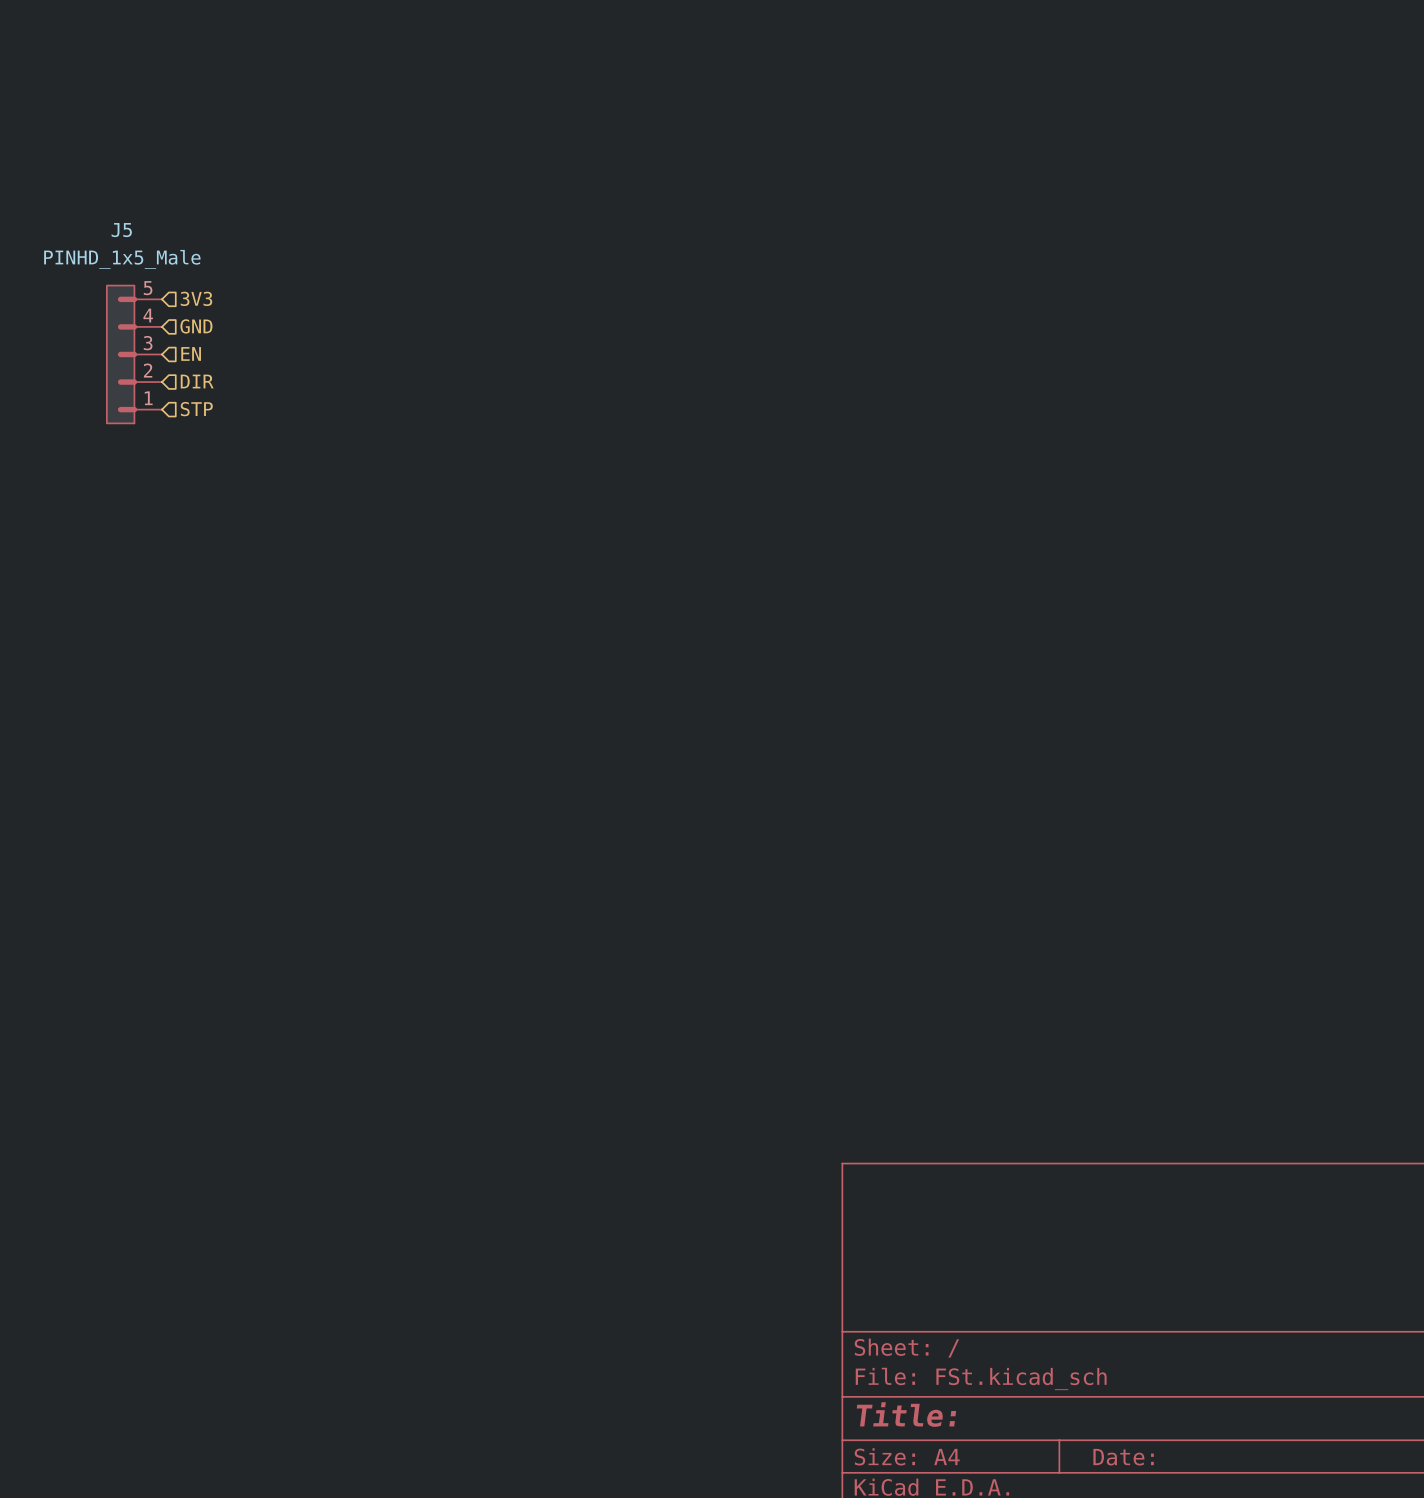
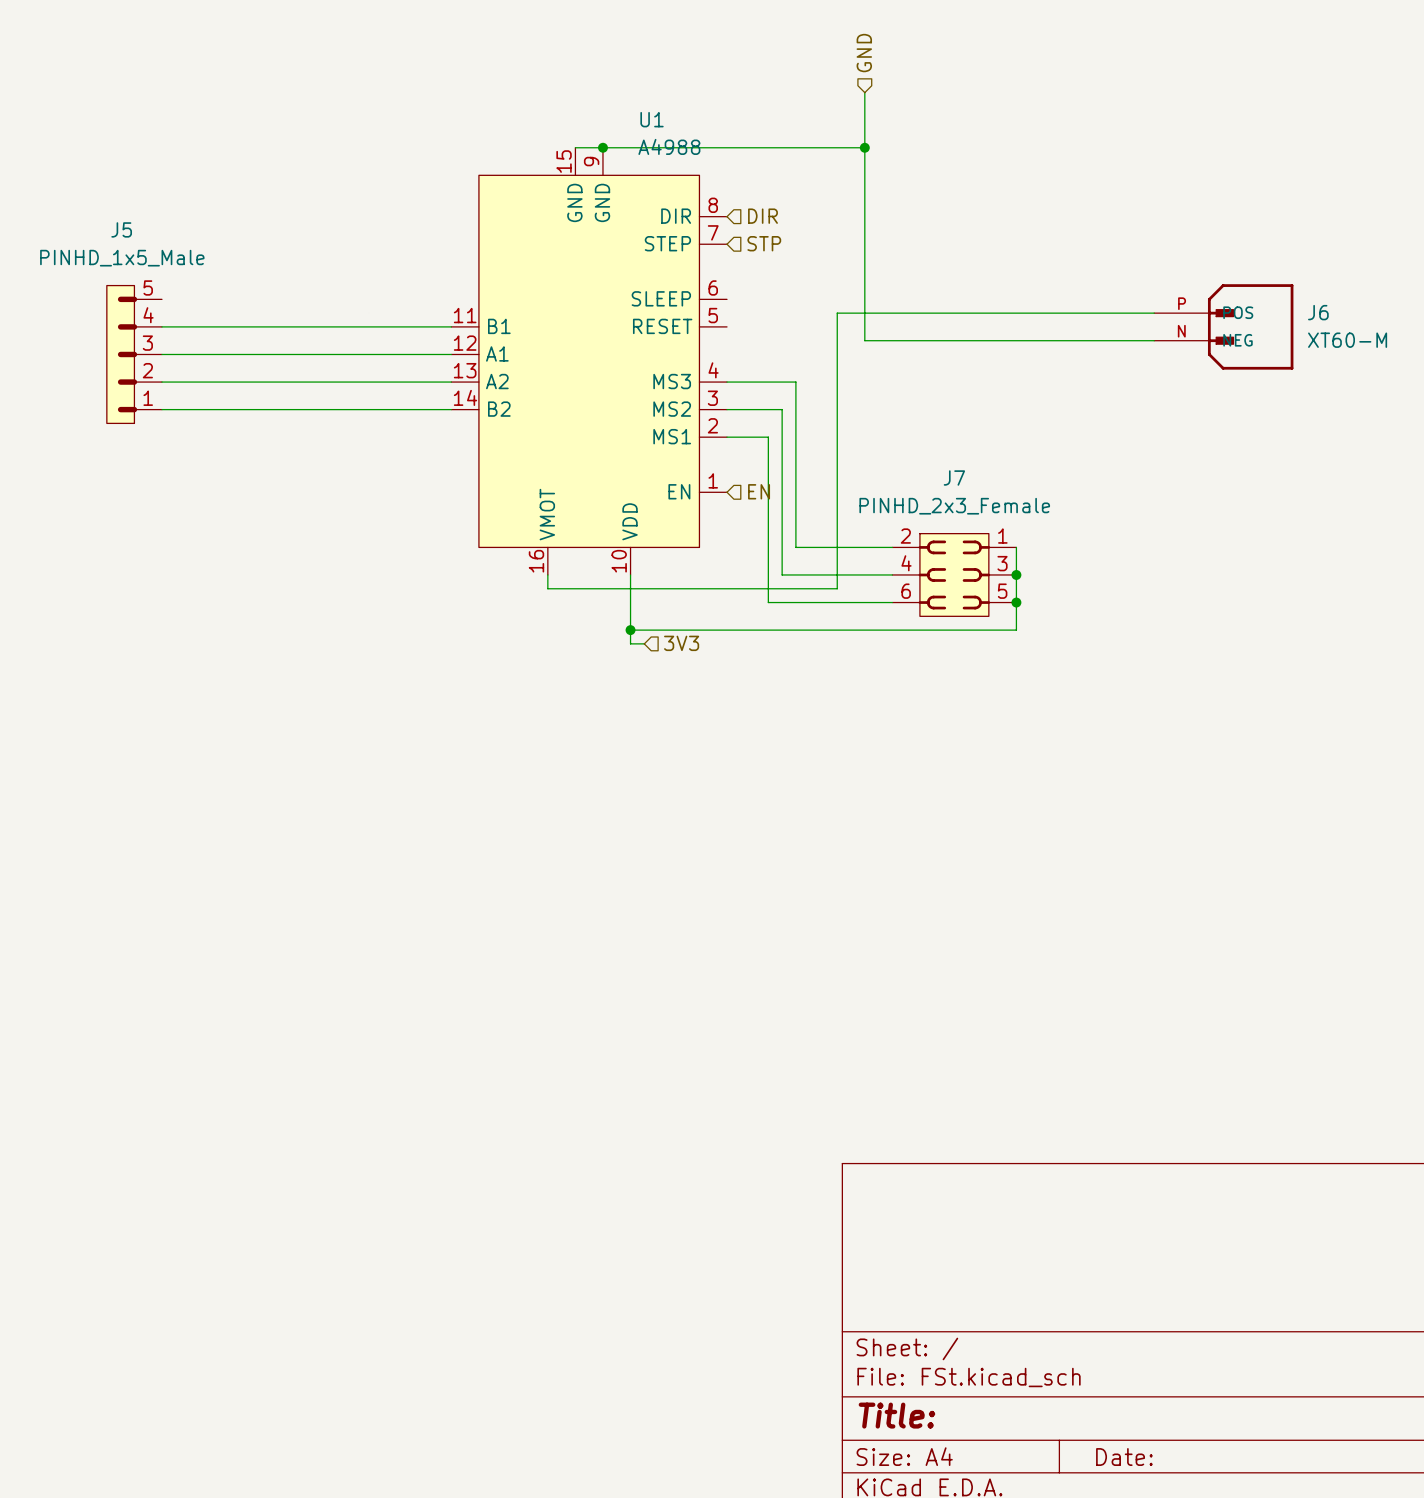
hierarchical label: none -> GND (864, 53)
wire: none -> (864, 92) (864, 340) (1154, 340)
wire: none -> (575, 147) (864, 147)
junction: none -> (602, 147)
junction: none -> (864, 147)
hierarchical label: none -> DIR (762, 216)
hierarchical label: none -> STP (764, 243)
hierarchical label: 3V3 (196, 298) -> none
wire: none -> (1154, 313) (837, 313) (837, 588) (547, 588) (547, 574)
wire: none -> (161, 326) (451, 326)
hierarchical label: GND (196, 326) -> none
J6: none -> XT60-M (1223, 326)
hierarchical label: EN (191, 353) -> none
wire: none -> (161, 354) (451, 354)
U1: none -> A4988 (547, 361)
hierarchical label: DIR (197, 381) -> none
wire: none -> (161, 382) (451, 382)
wire: none -> (727, 382) (795, 382) (795, 547) (892, 547)
wire: none -> (161, 409) (451, 409)
hierarchical label: STP (196, 409) -> none
wire: none -> (727, 409) (782, 409) (782, 574) (892, 574)
wire: none -> (727, 437) (768, 437) (768, 602) (892, 602)
hierarchical label: none -> EN (759, 491)
wire: none -> (1016, 547) (1016, 630) (630, 630)
wire: none -> (630, 574) (630, 643) (644, 643)
J7: none -> PINHD_2x3_Female (954, 574)
junction: none -> (1016, 574)
junction: none -> (1016, 602)
junction: none -> (630, 630)
hierarchical label: none -> 3V3 (681, 643)

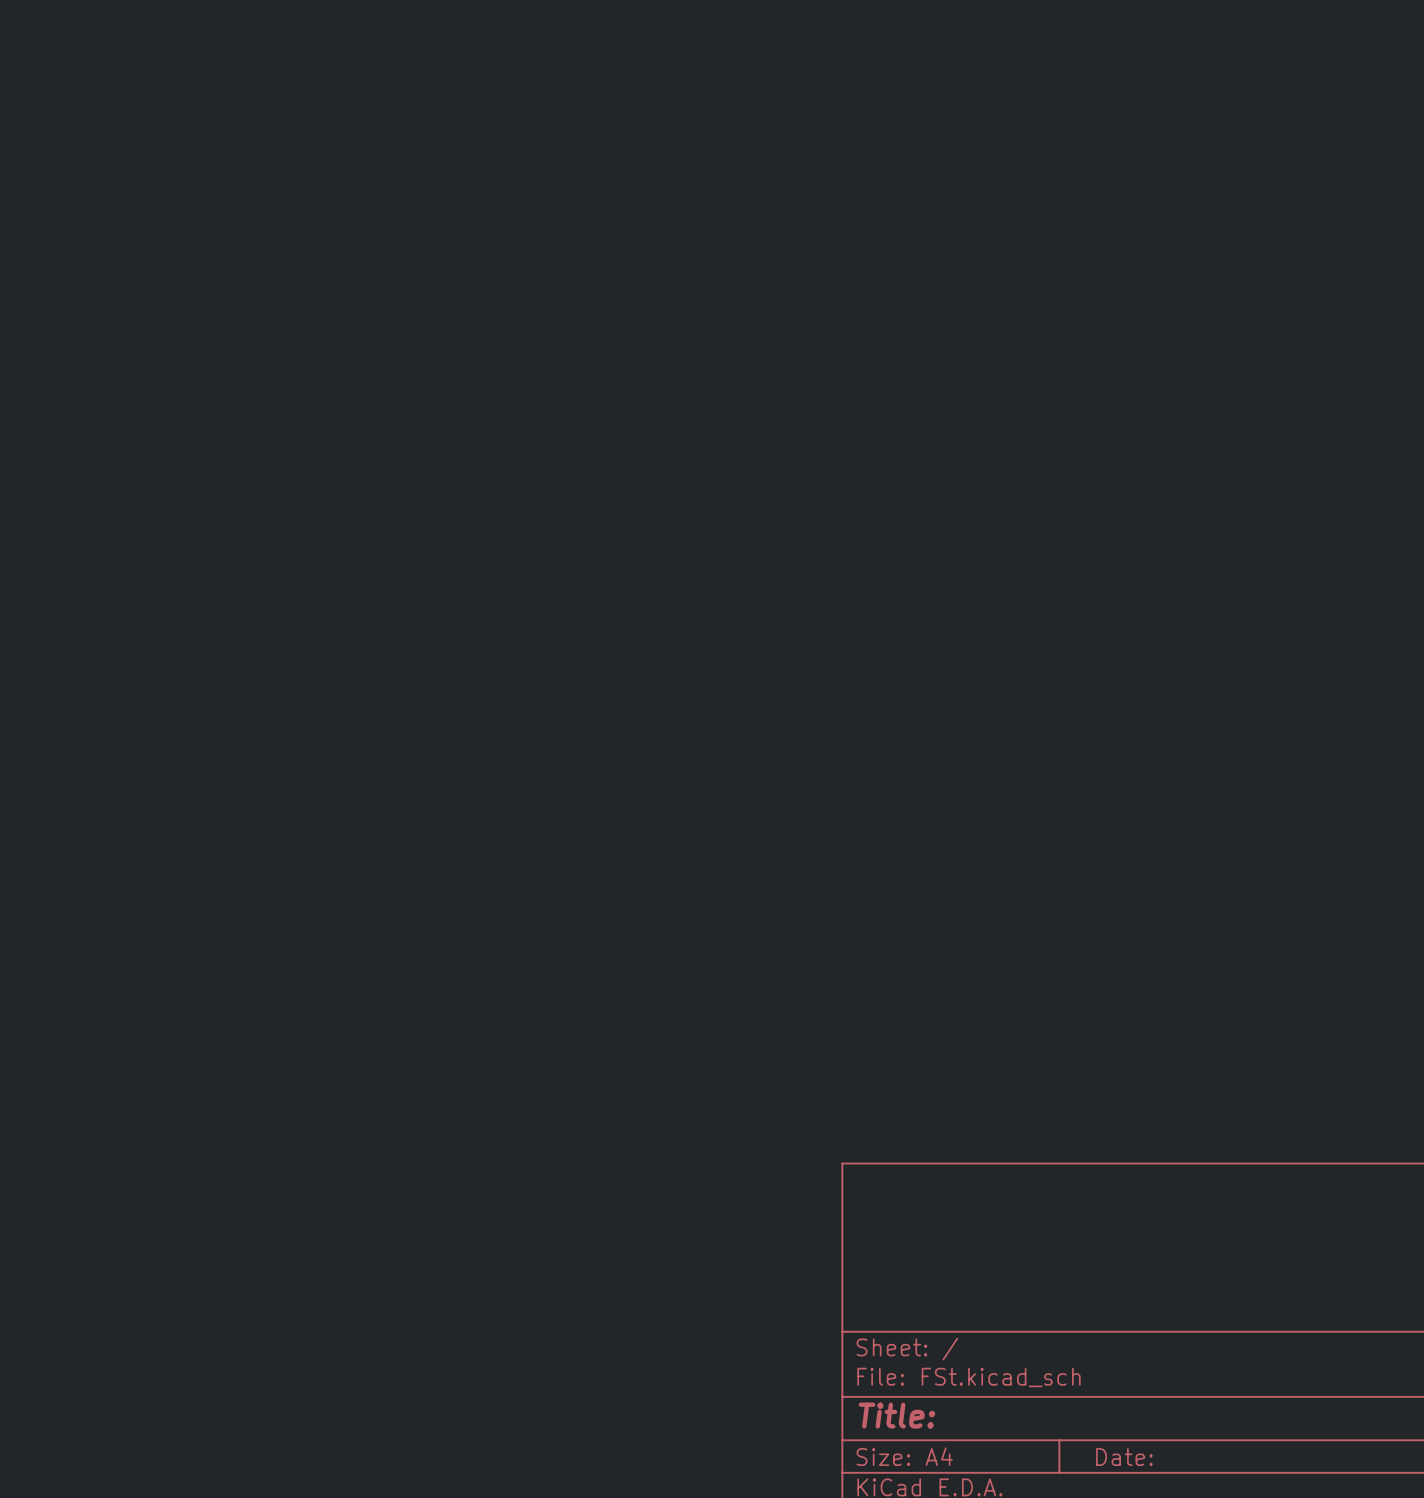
hierarchical label: GND (864, 53) -> none
wire: (864, 92) (864, 340) (1154, 340) -> none
wire: (575, 147) (864, 147) -> none
junction: (602, 147) -> none
junction: (864, 147) -> none
hierarchical label: DIR (762, 216) -> none
hierarchical label: STP (764, 243) -> none
wire: (1154, 313) (837, 313) (837, 588) (547, 588) (547, 574) -> none
wire: (161, 326) (451, 326) -> none
J6: XT60-M (1223, 326) -> none
J5: PINHD_1x5_Male (134, 354) -> none
wire: (161, 354) (451, 354) -> none
U1: A4988 (547, 361) -> none
wire: (161, 382) (451, 382) -> none
wire: (727, 382) (795, 382) (795, 547) (892, 547) -> none
wire: (161, 409) (451, 409) -> none
wire: (727, 409) (782, 409) (782, 574) (892, 574) -> none
wire: (727, 437) (768, 437) (768, 602) (892, 602) -> none
hierarchical label: EN (759, 491) -> none
wire: (1016, 547) (1016, 630) (630, 630) -> none
wire: (630, 574) (630, 643) (644, 643) -> none
J7: PINHD_2x3_Female (954, 574) -> none
junction: (1016, 574) -> none
junction: (1016, 602) -> none
junction: (630, 630) -> none
hierarchical label: 3V3 (681, 643) -> none

